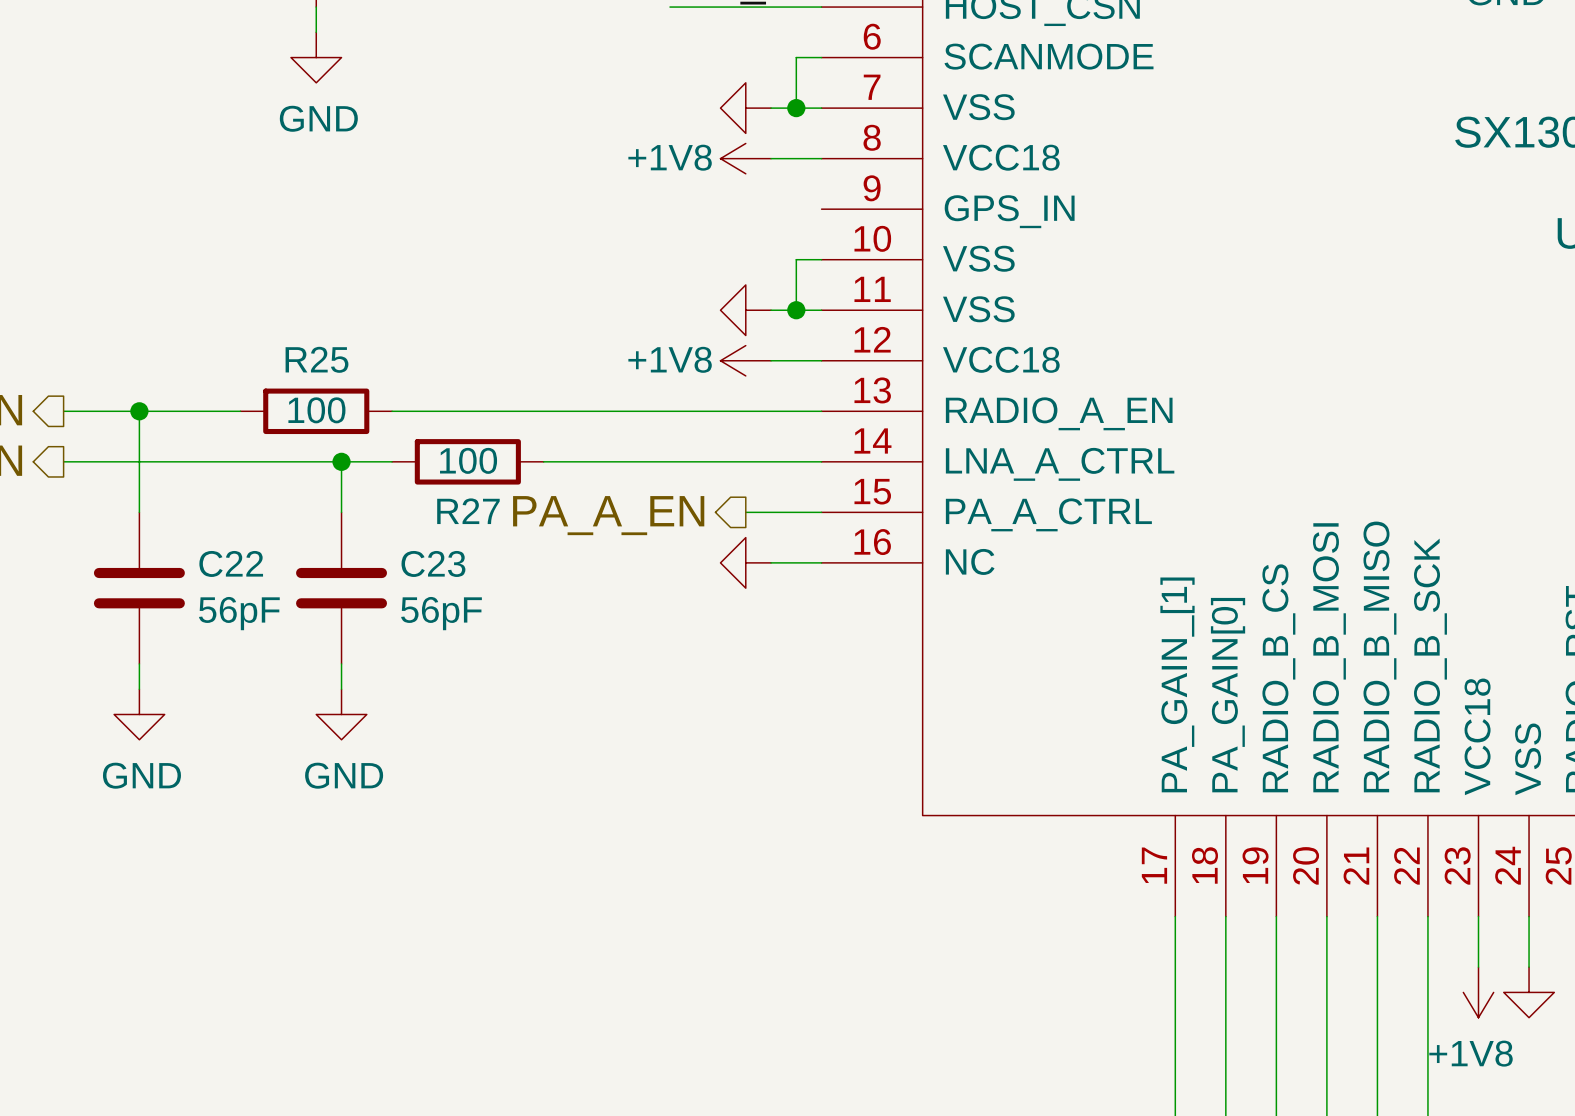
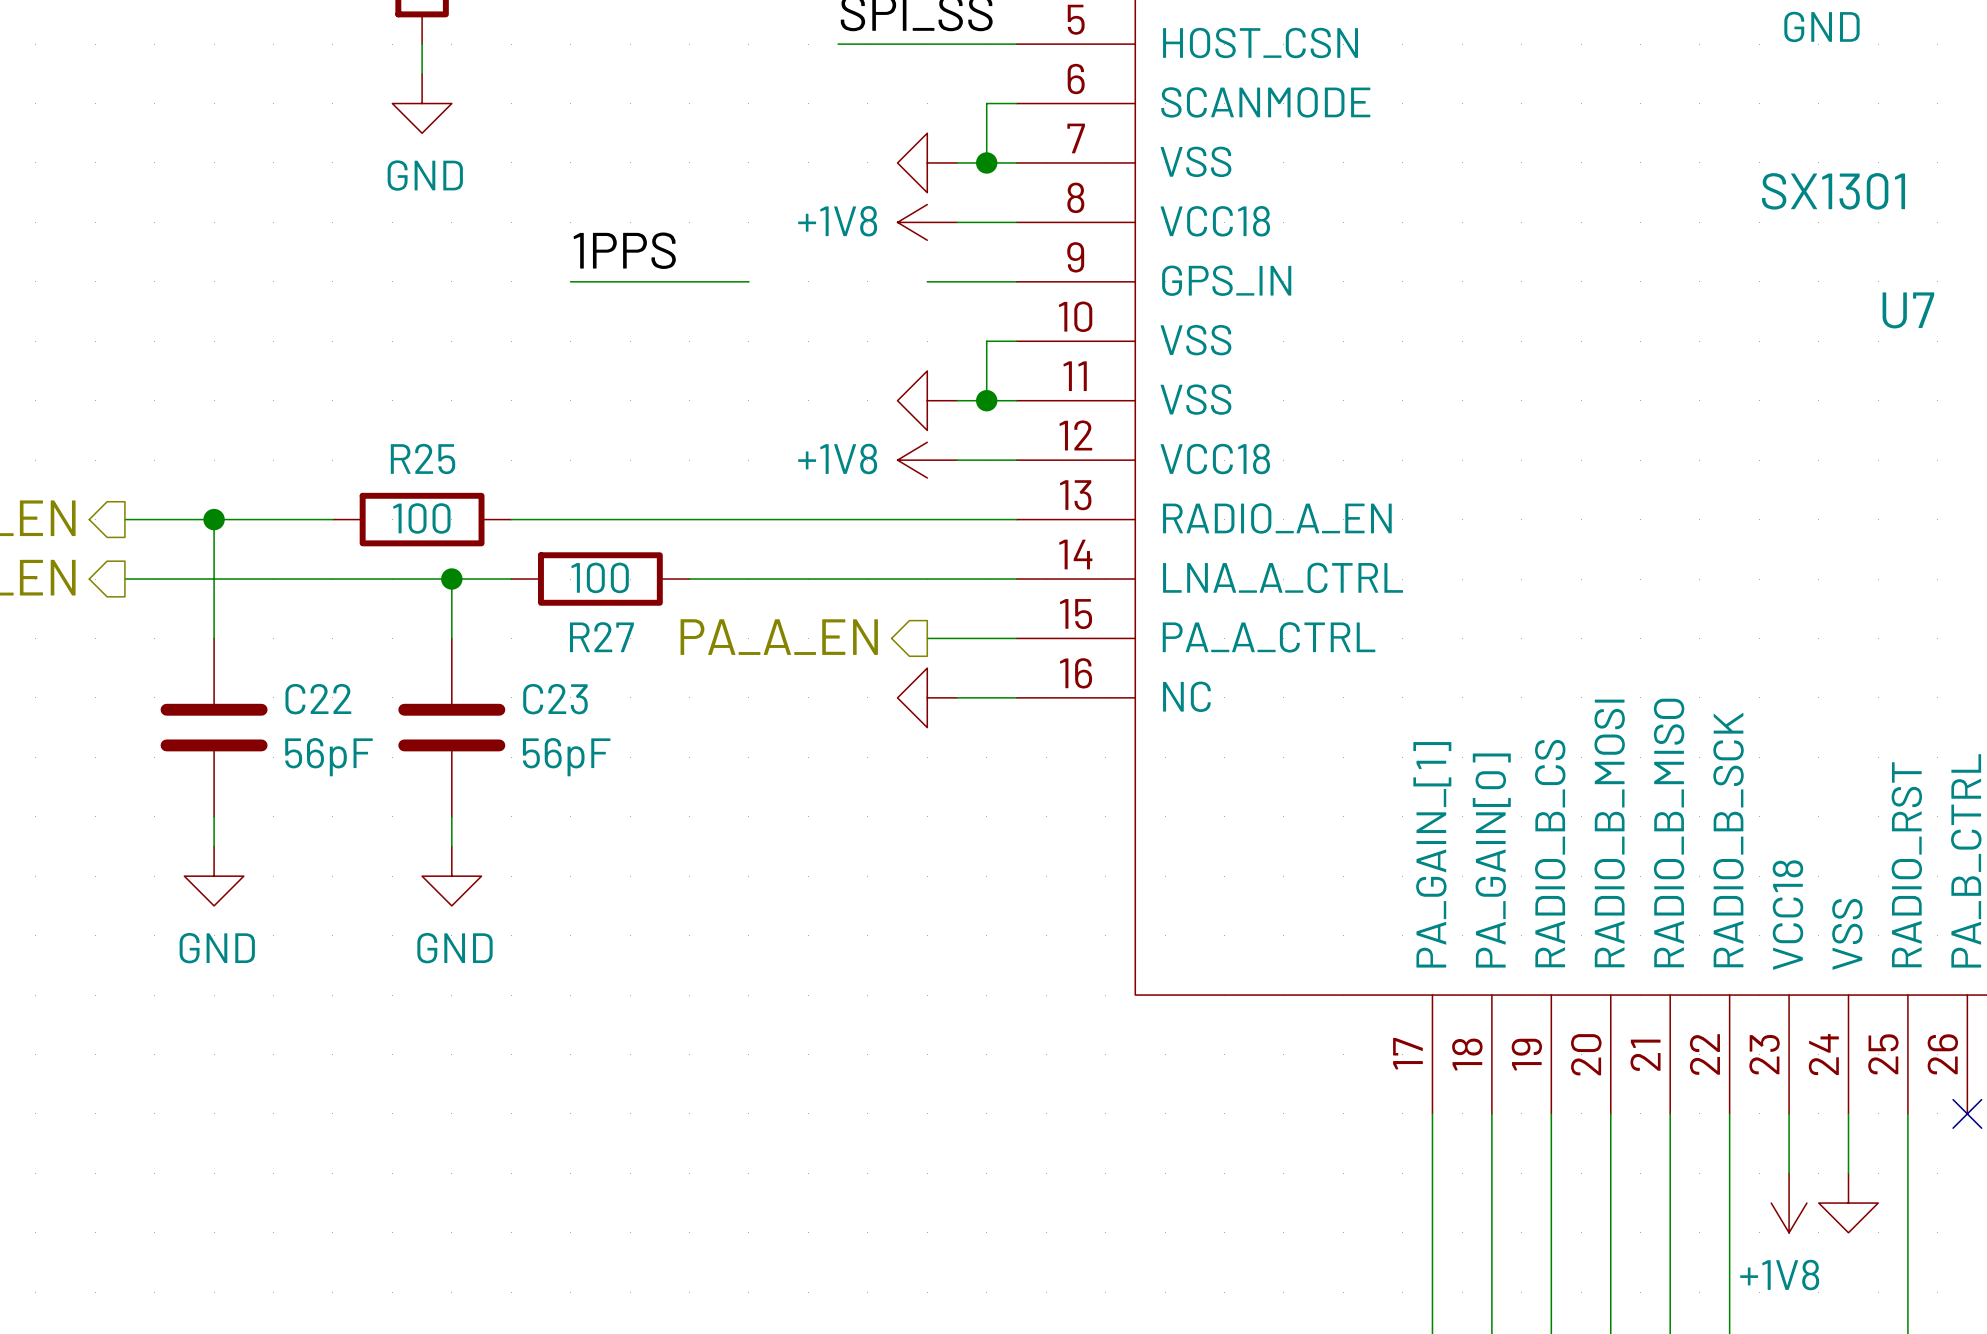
label: none -> 1PPS (624, 250)
wire: none -> (570, 281) (748, 281)
wire: none -> (927, 281) (1016, 281)

